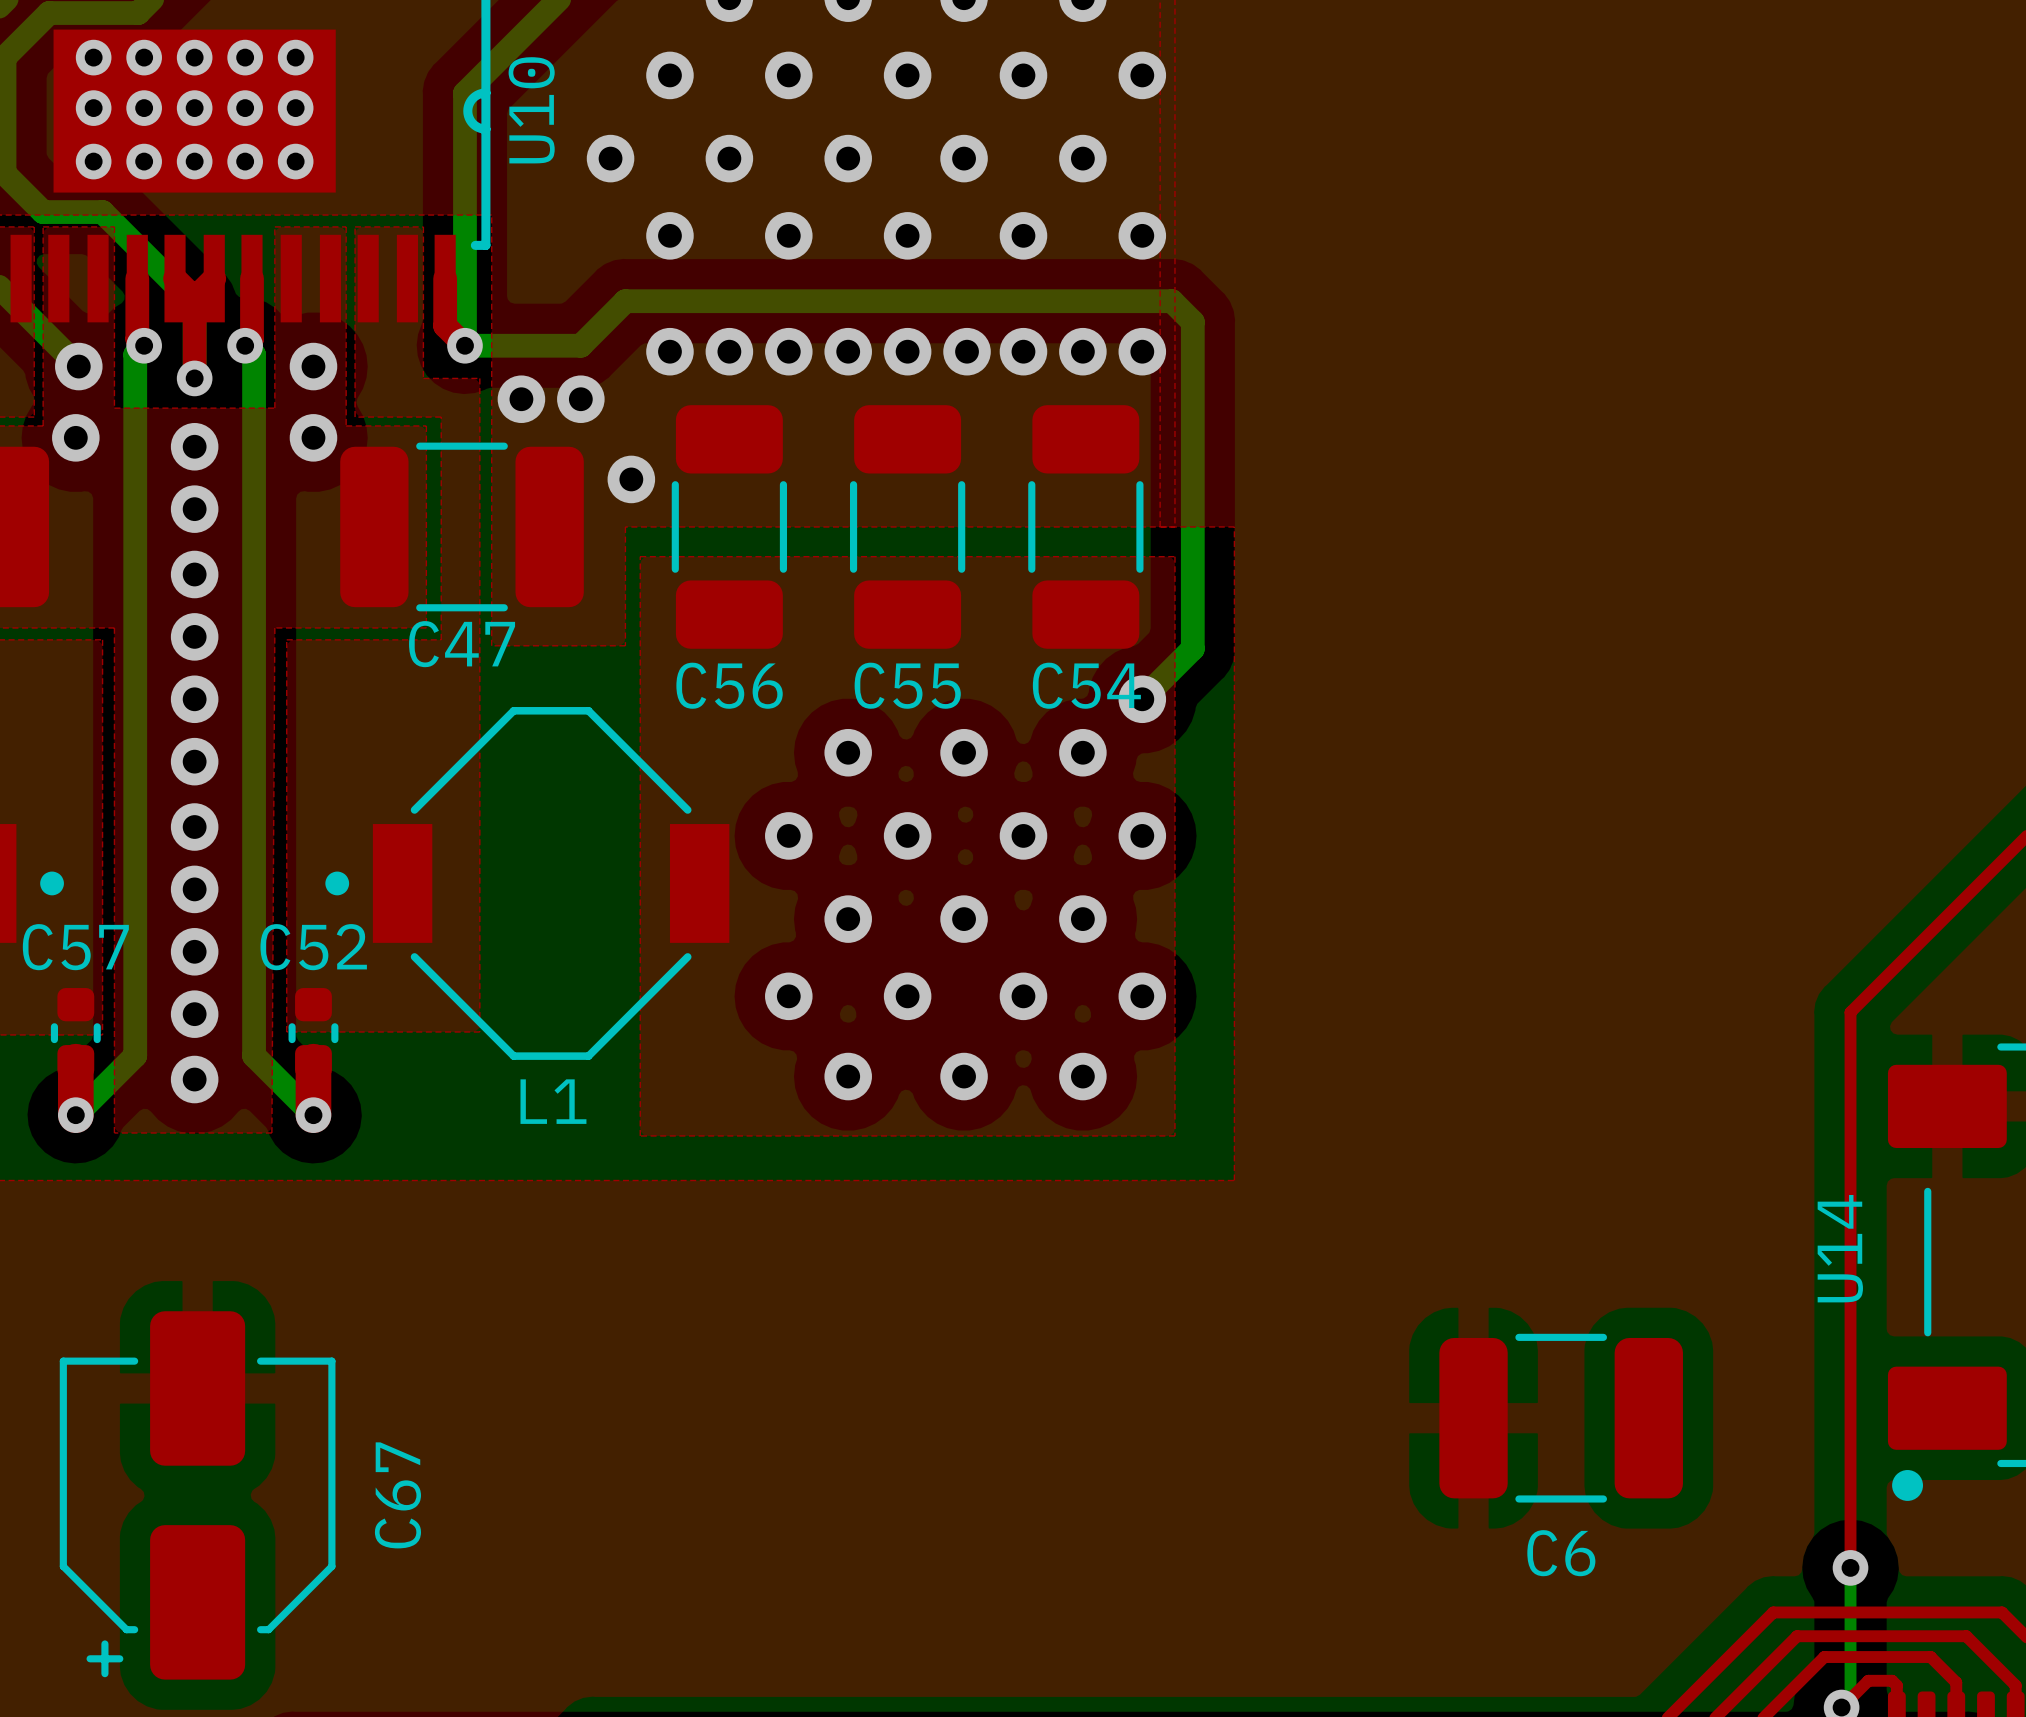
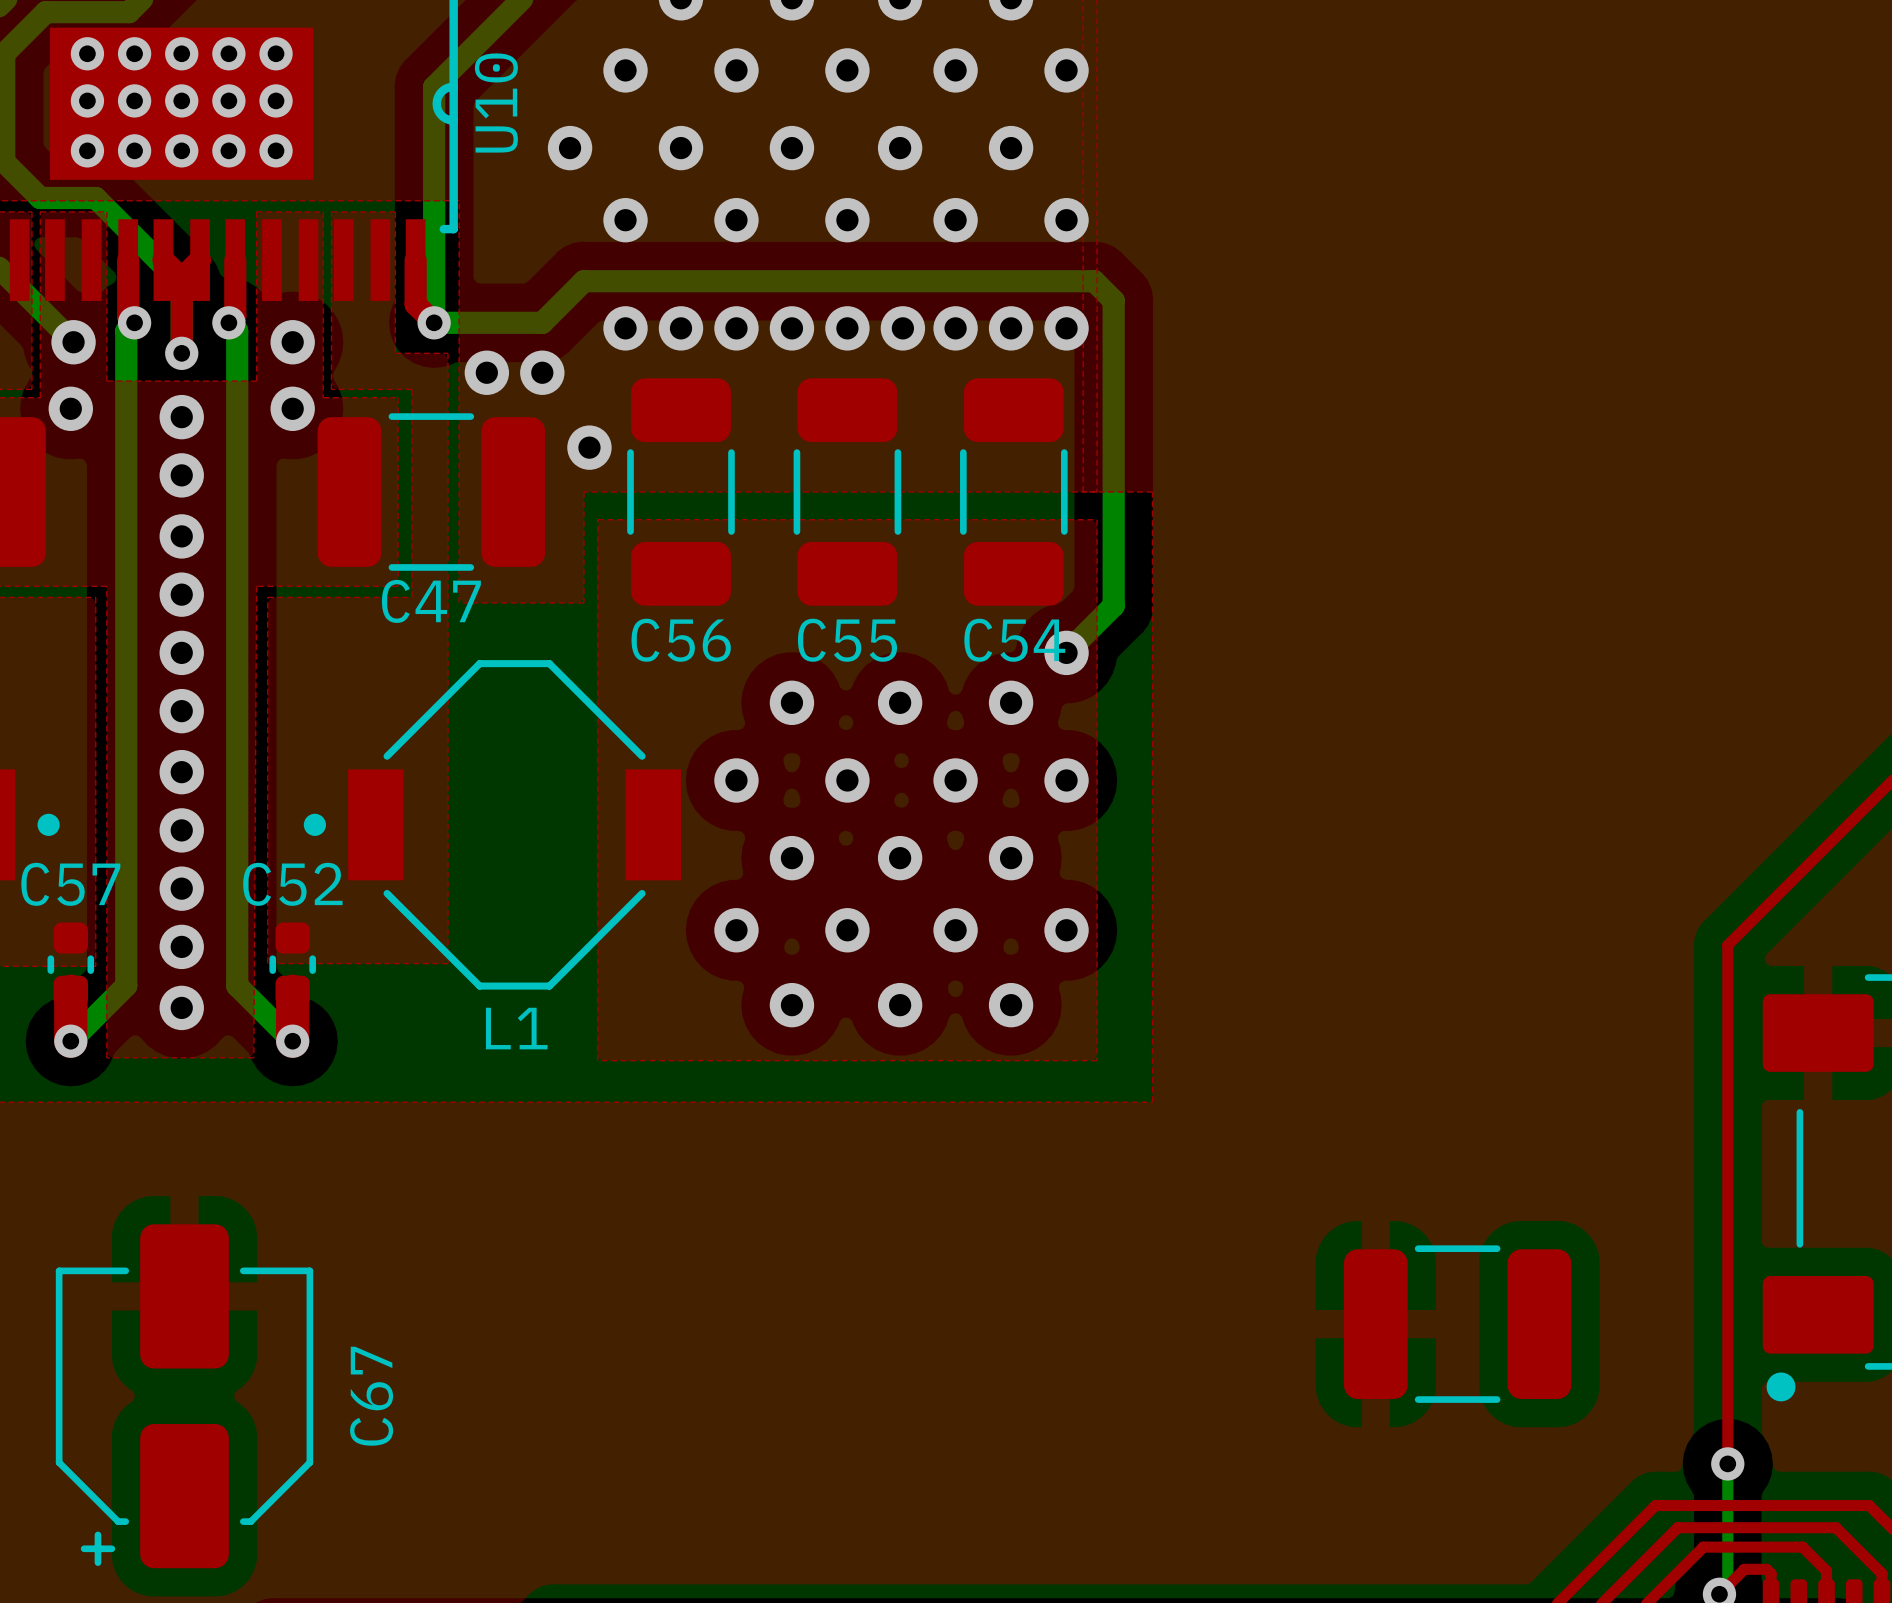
U14 name: U14 (1840, 1248) -> none
C6 name: C6 (1561, 1553) -> none

